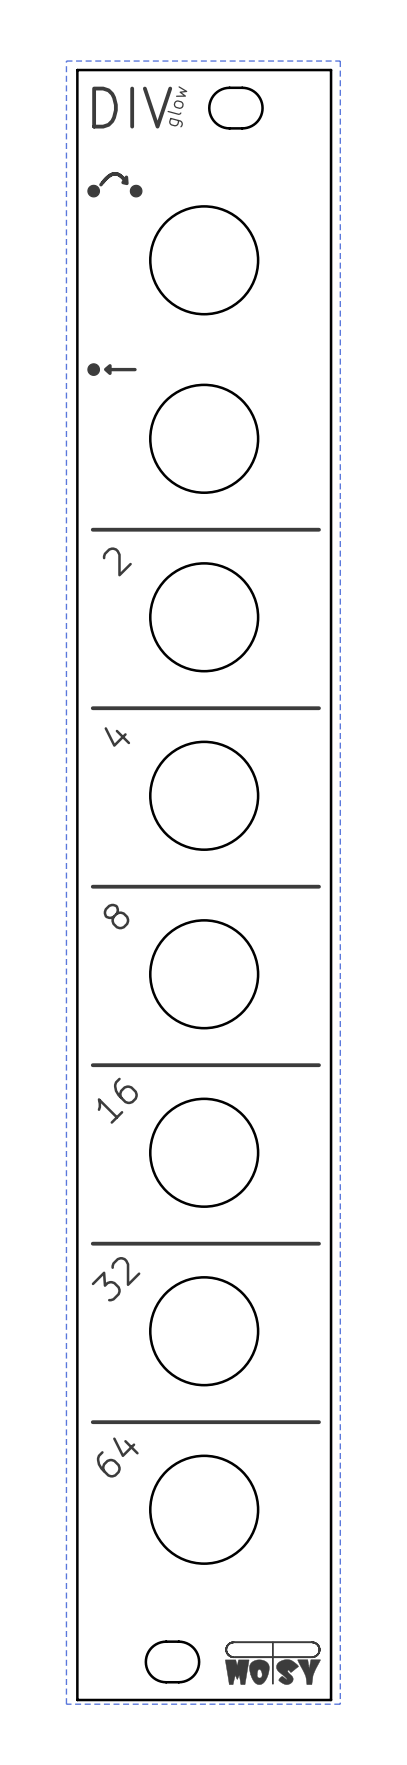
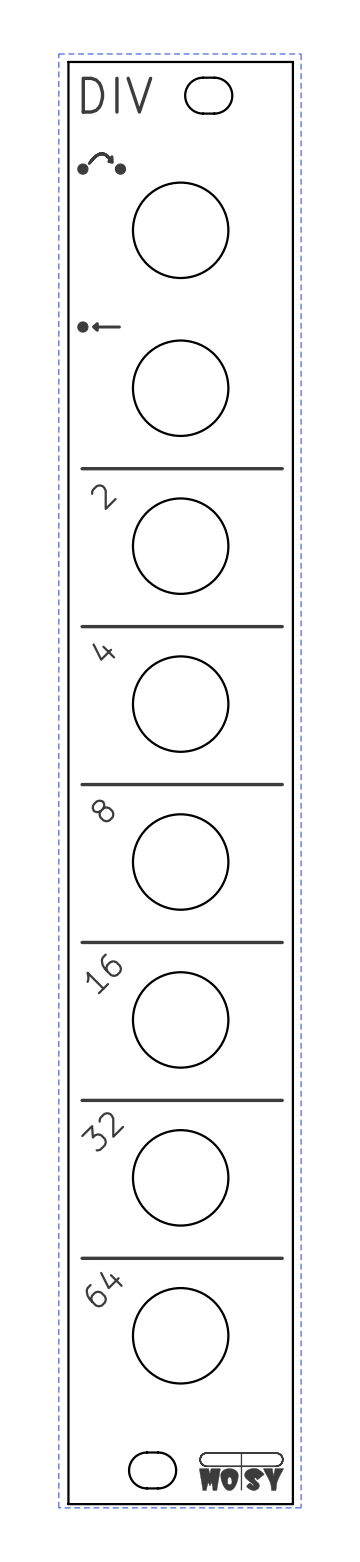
text: glow (177, 106) -> none

